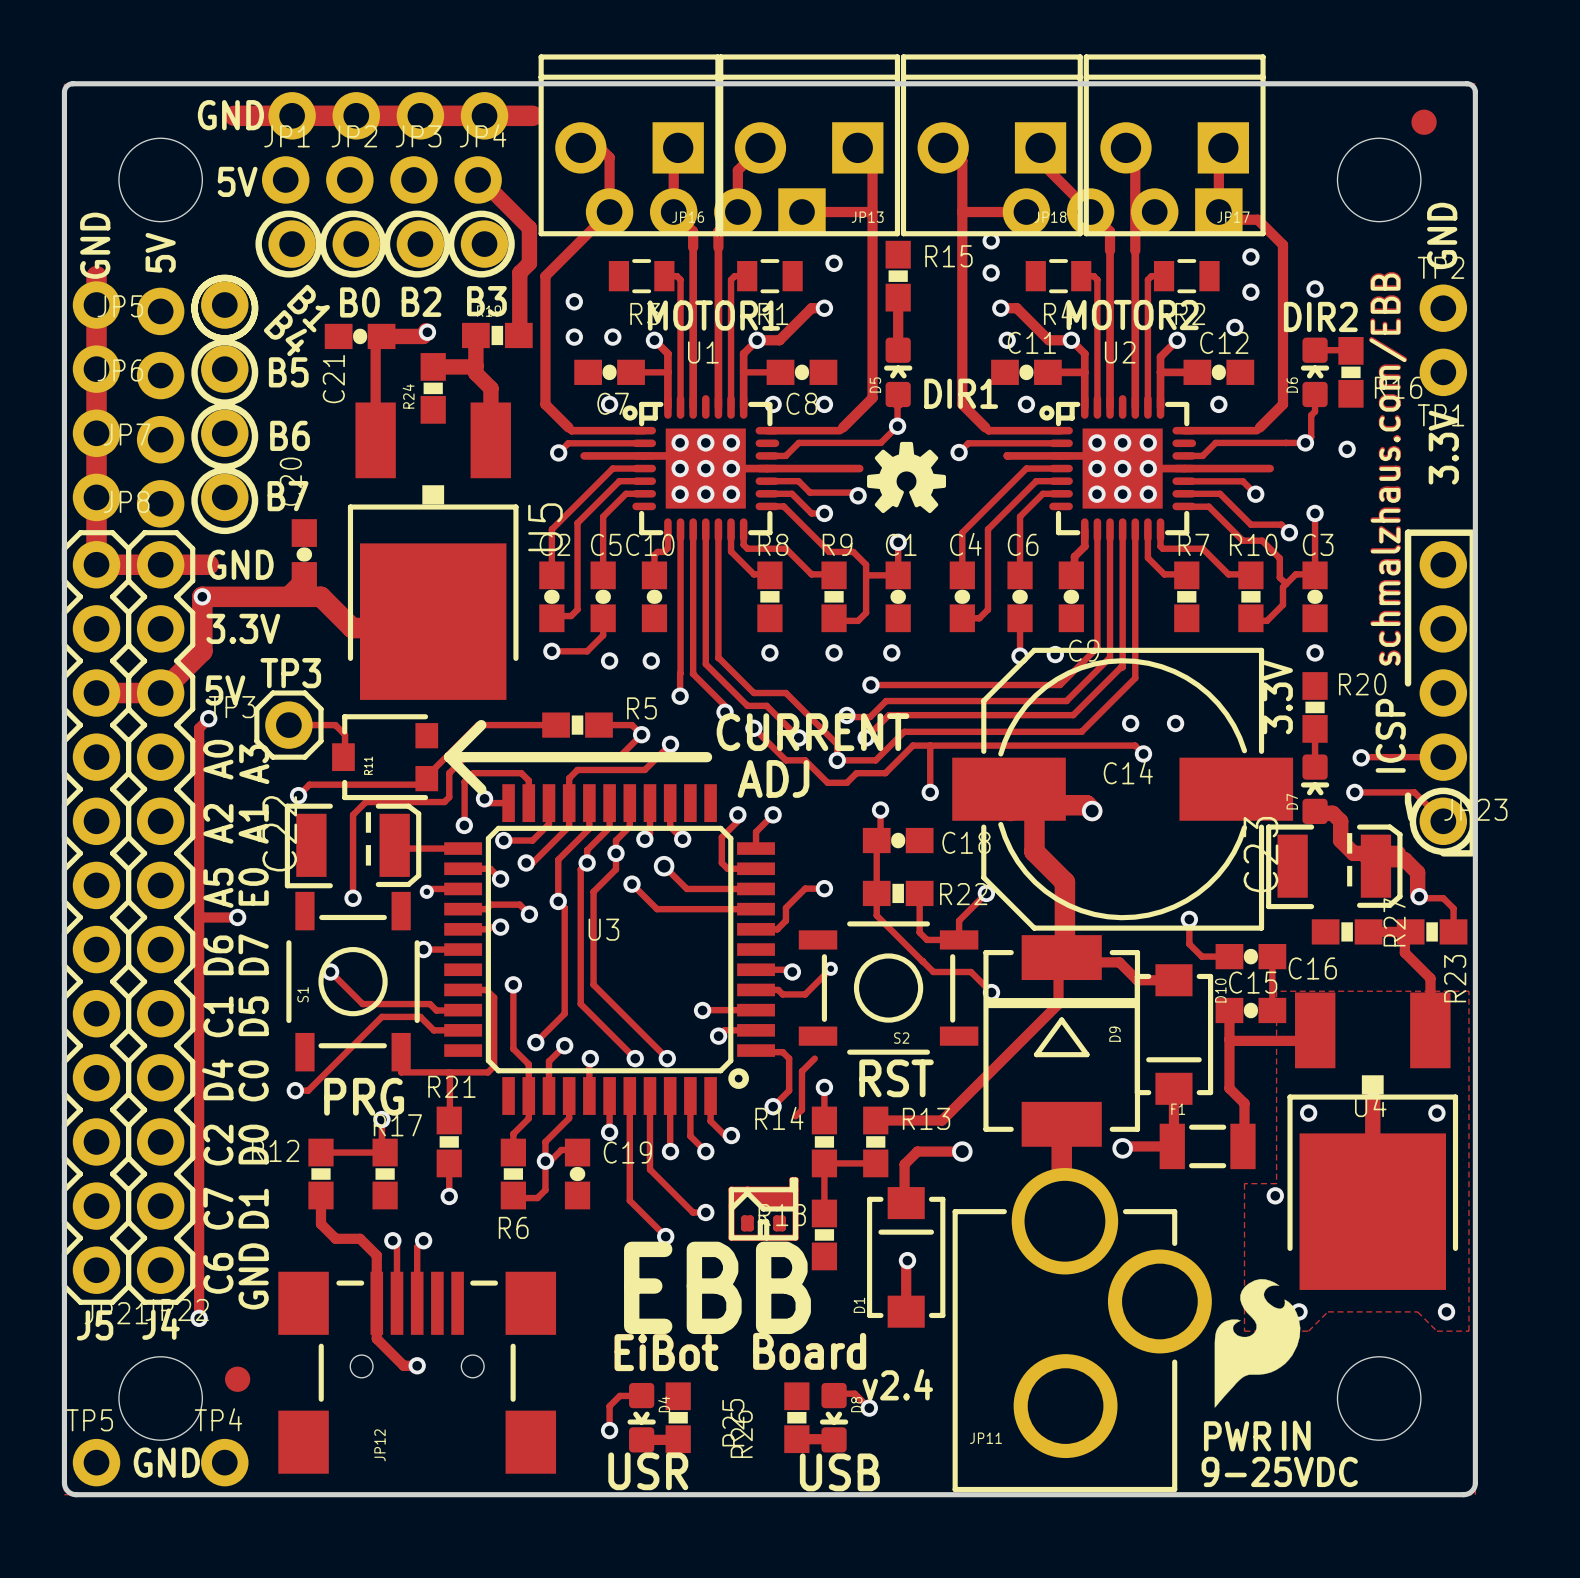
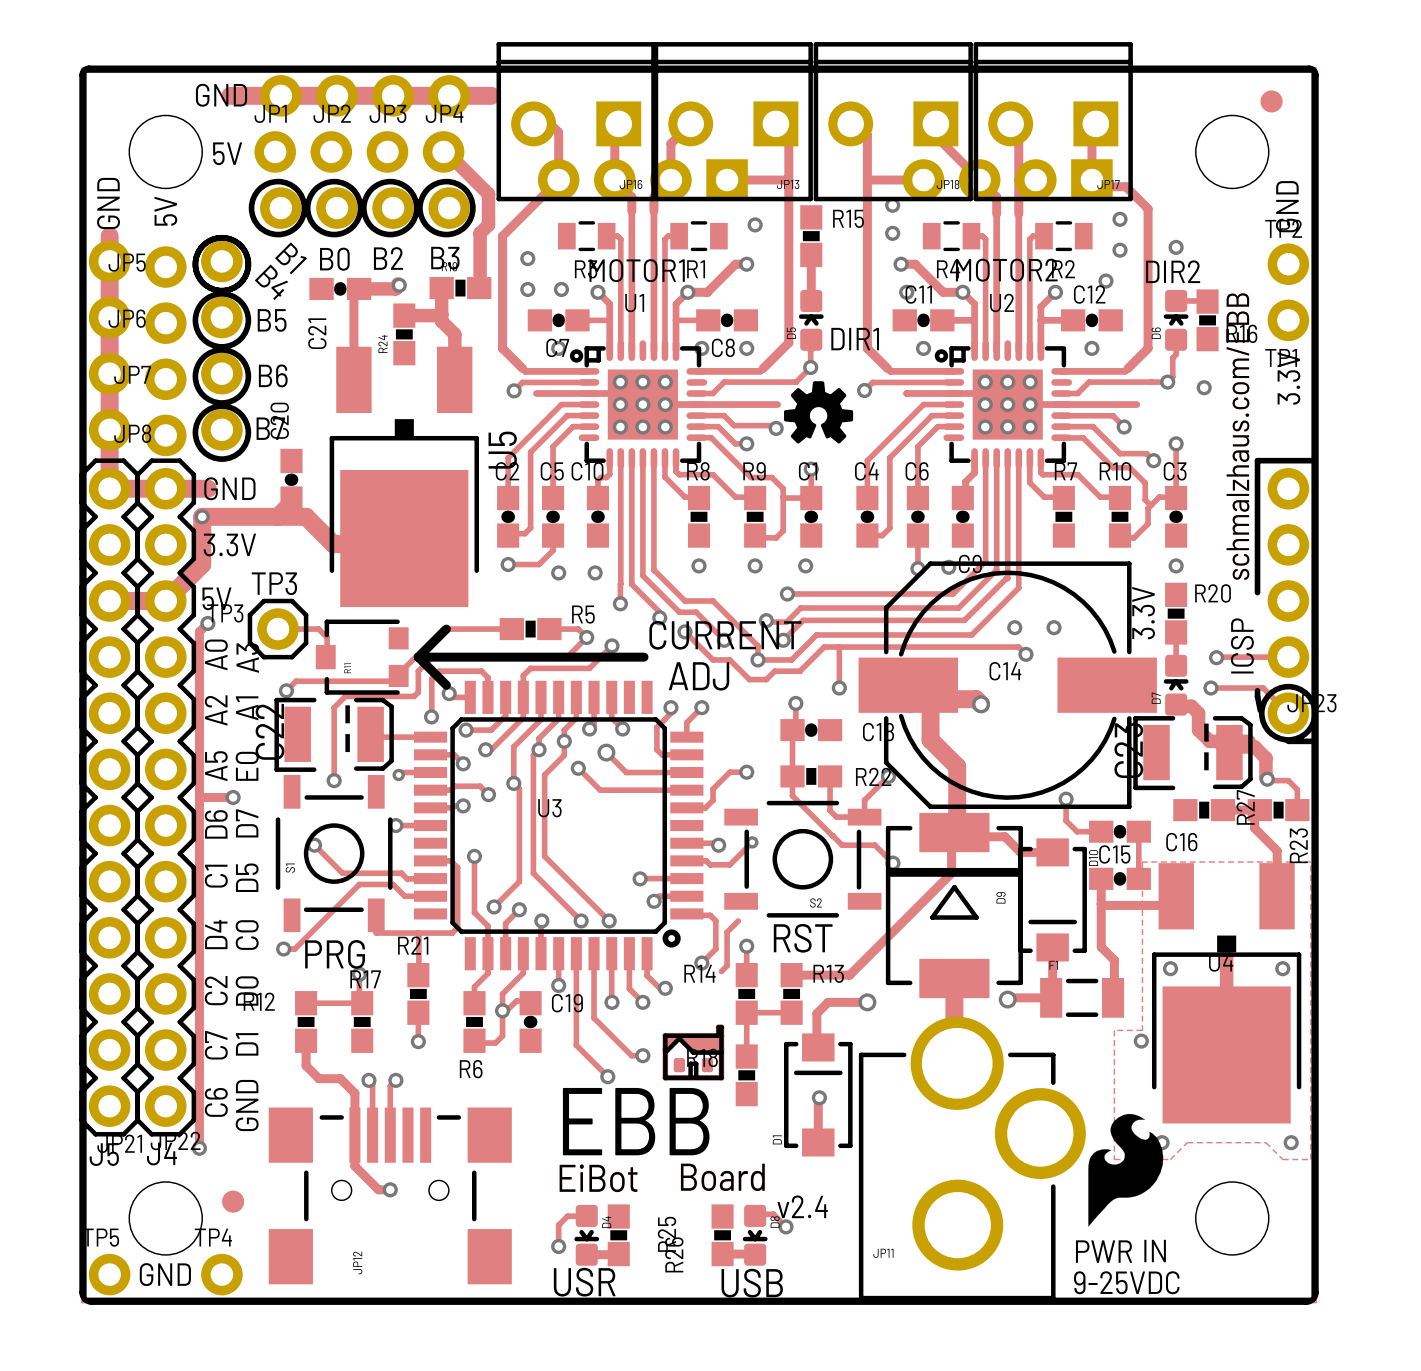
line: none -> (1313, 460) (1313, 70) (84, 70) (84, 1299) (1313, 1299) (1313, 741)

